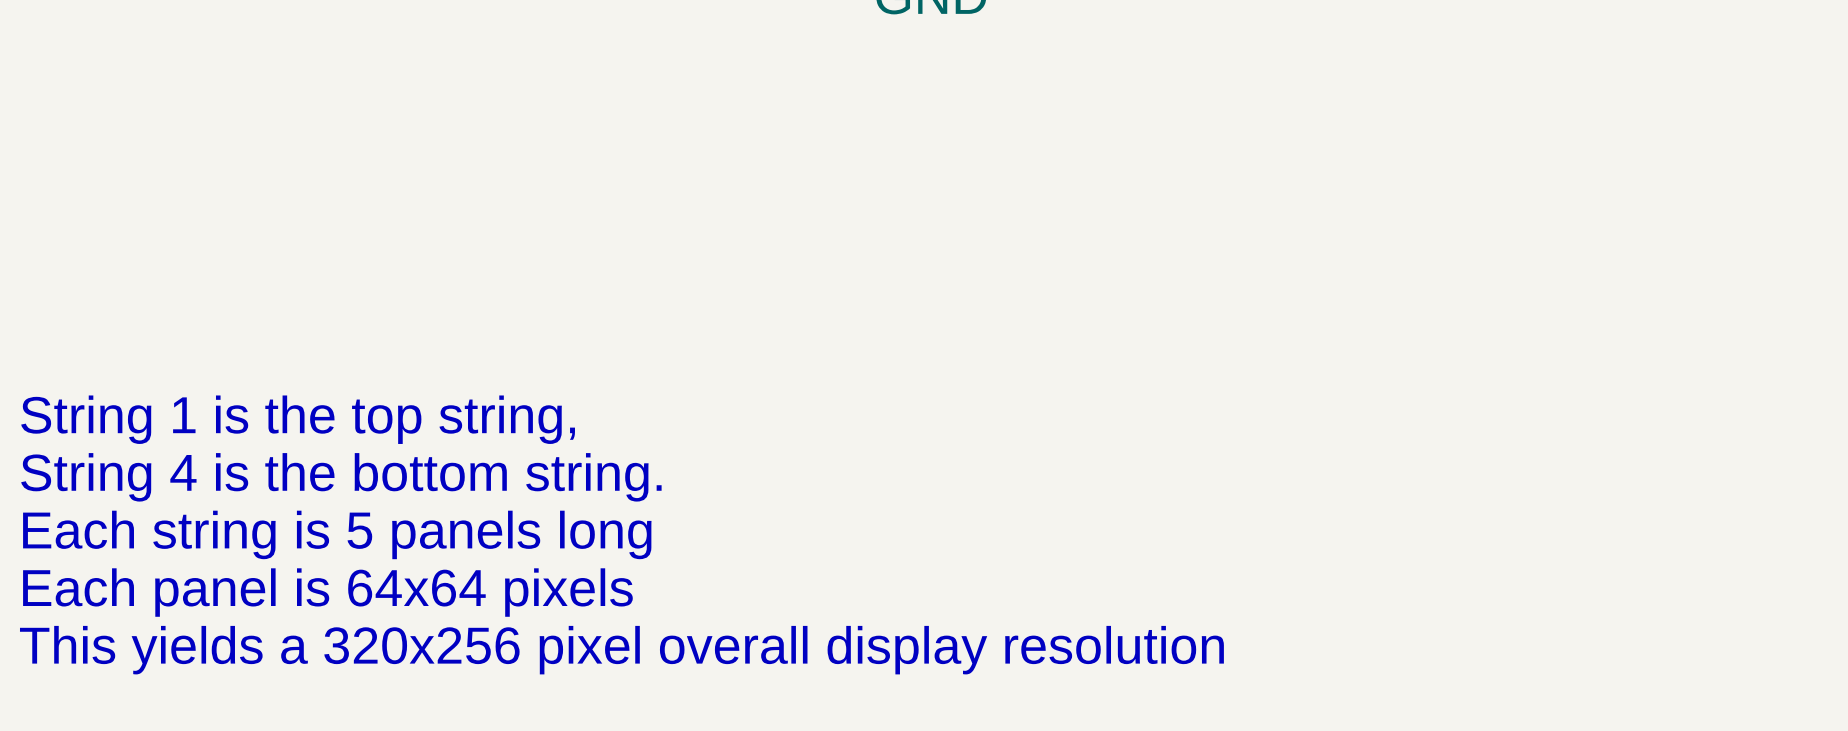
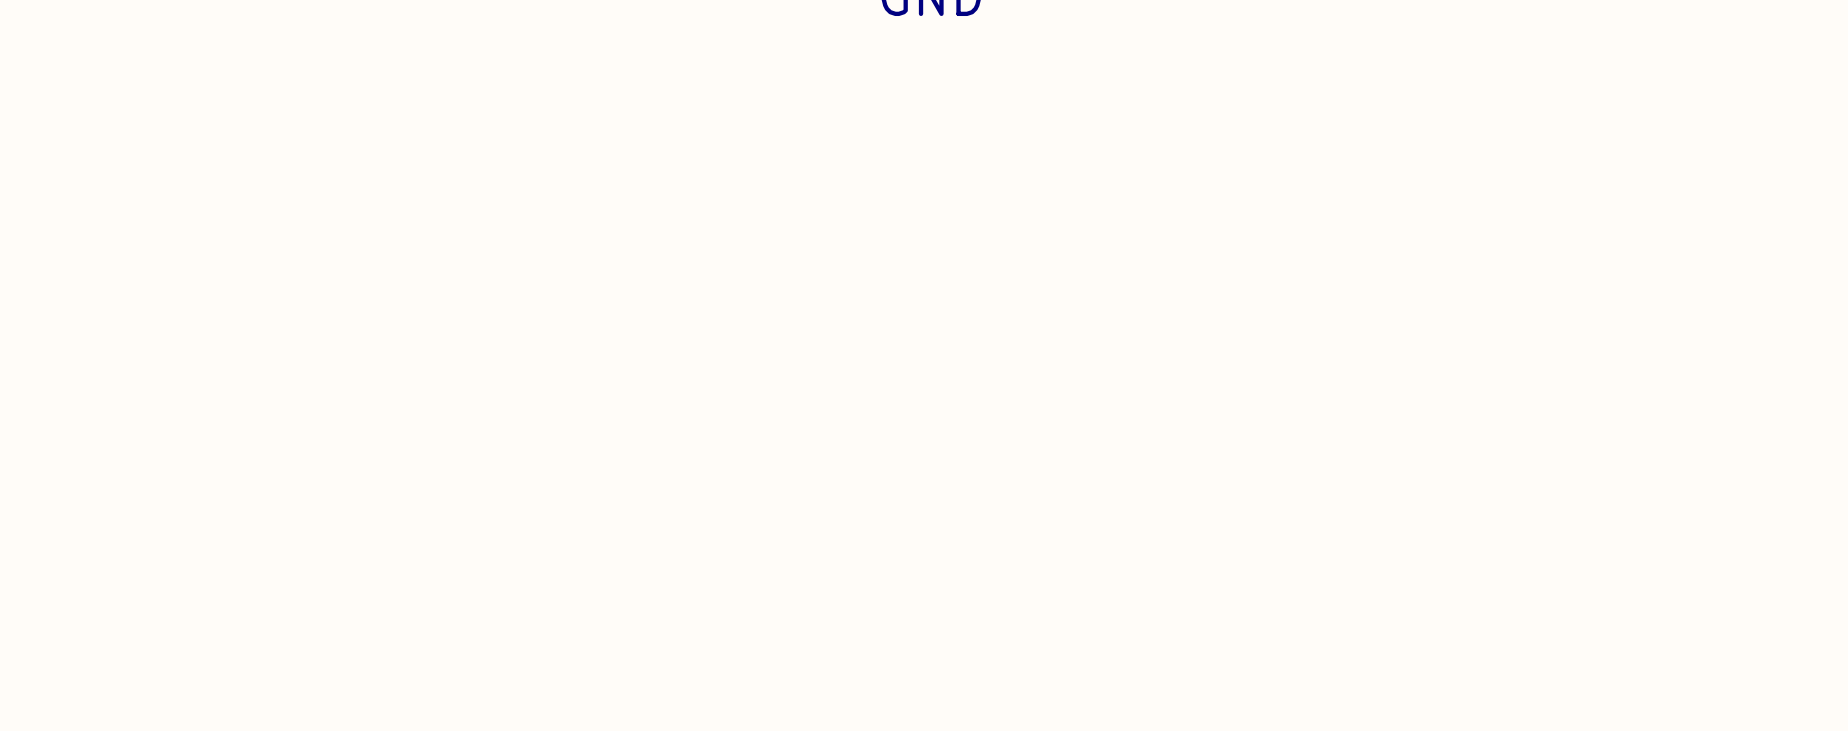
text: String 1 is the top string, (298, 419) -> none
text: String 4 is the bottom string. (341, 477) -> none
text: Each string is 5 panels long (337, 534) -> none
text: Each panel is 64x64 pixels (327, 592) -> none
text: This yields a 320x256 pixel overall display resolution (621, 650) -> none

